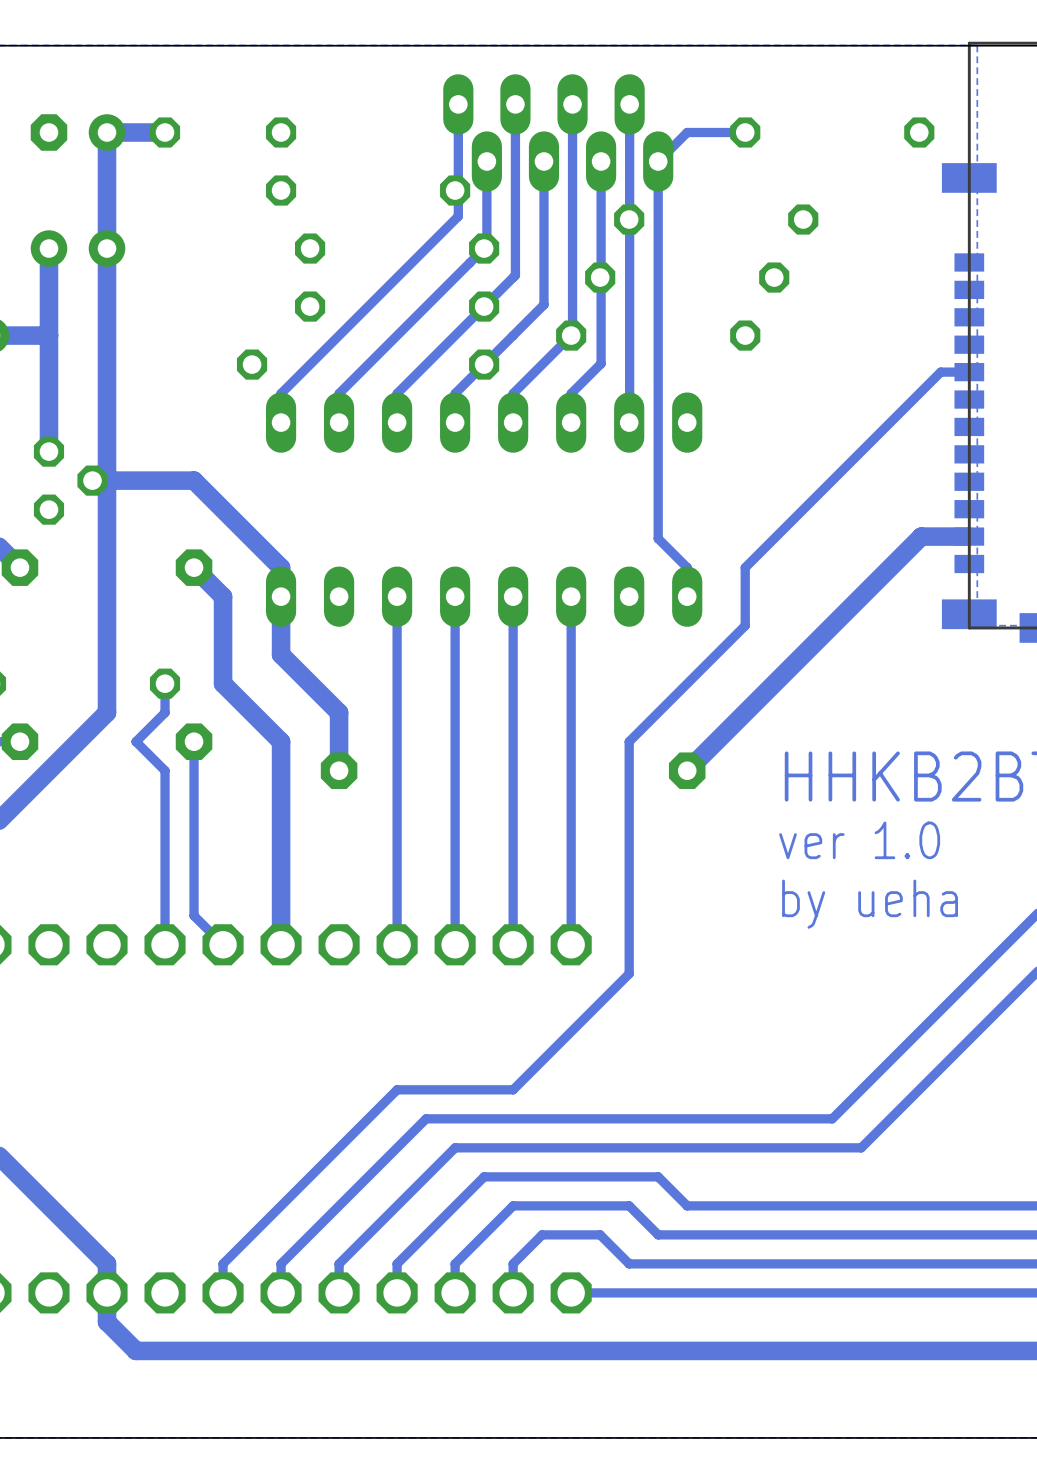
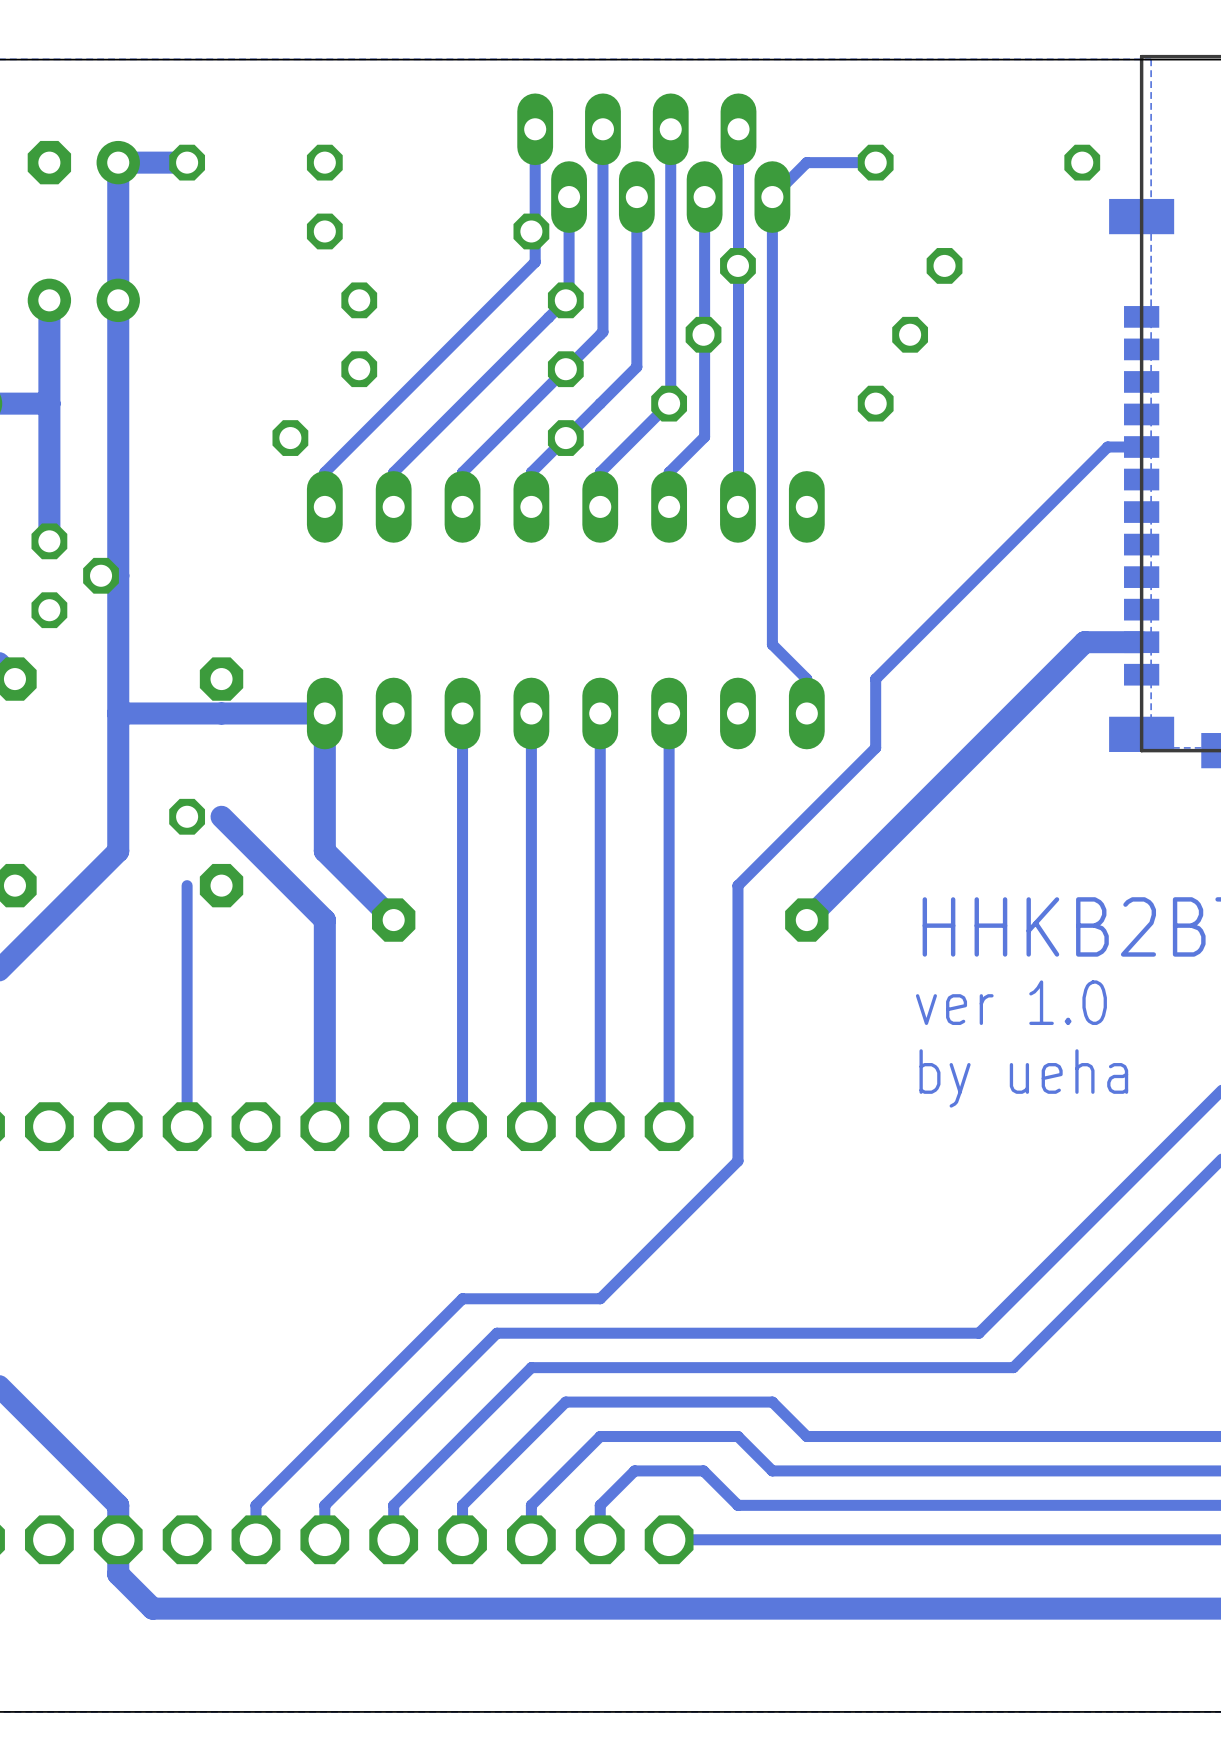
track: (107, 480) (194, 480) (281, 567) (281, 596) -> (118, 713) (324, 713)
track: (194, 567) (223, 596) (223, 683) (281, 741) (281, 770) -> (221, 816) (324, 920)
track: (281, 654) (339, 712) (339, 770) -> (324, 782) (324, 851) (393, 920)
track: (165, 683) (165, 712) (136, 741) (165, 770) -> (187, 885) (187, 920)
track: (194, 741) (194, 915) (223, 944) -> none

